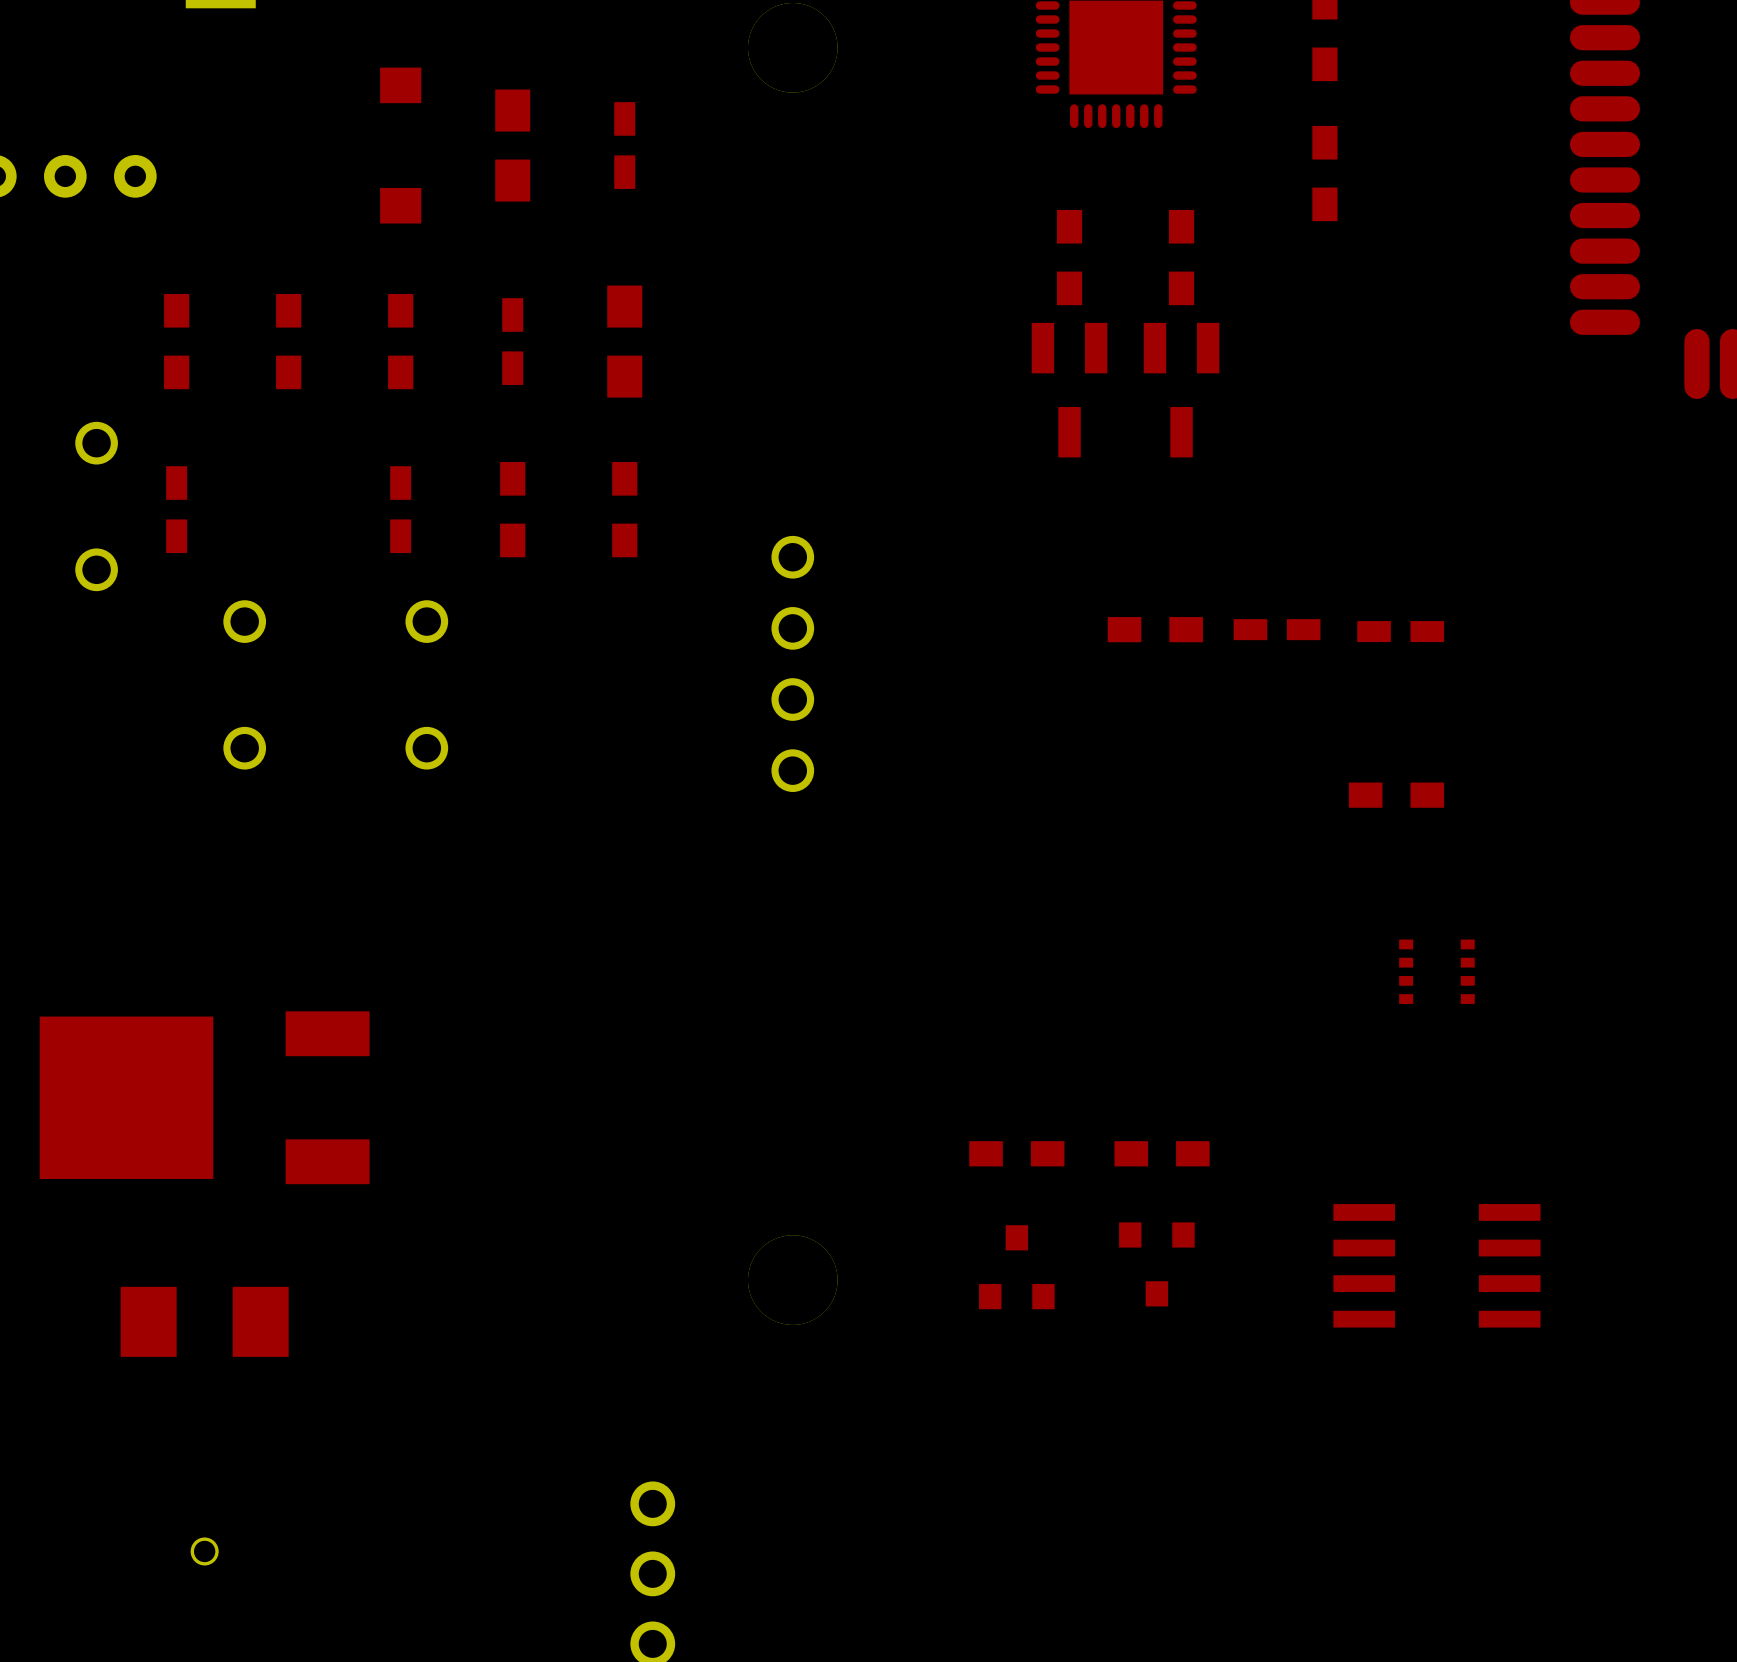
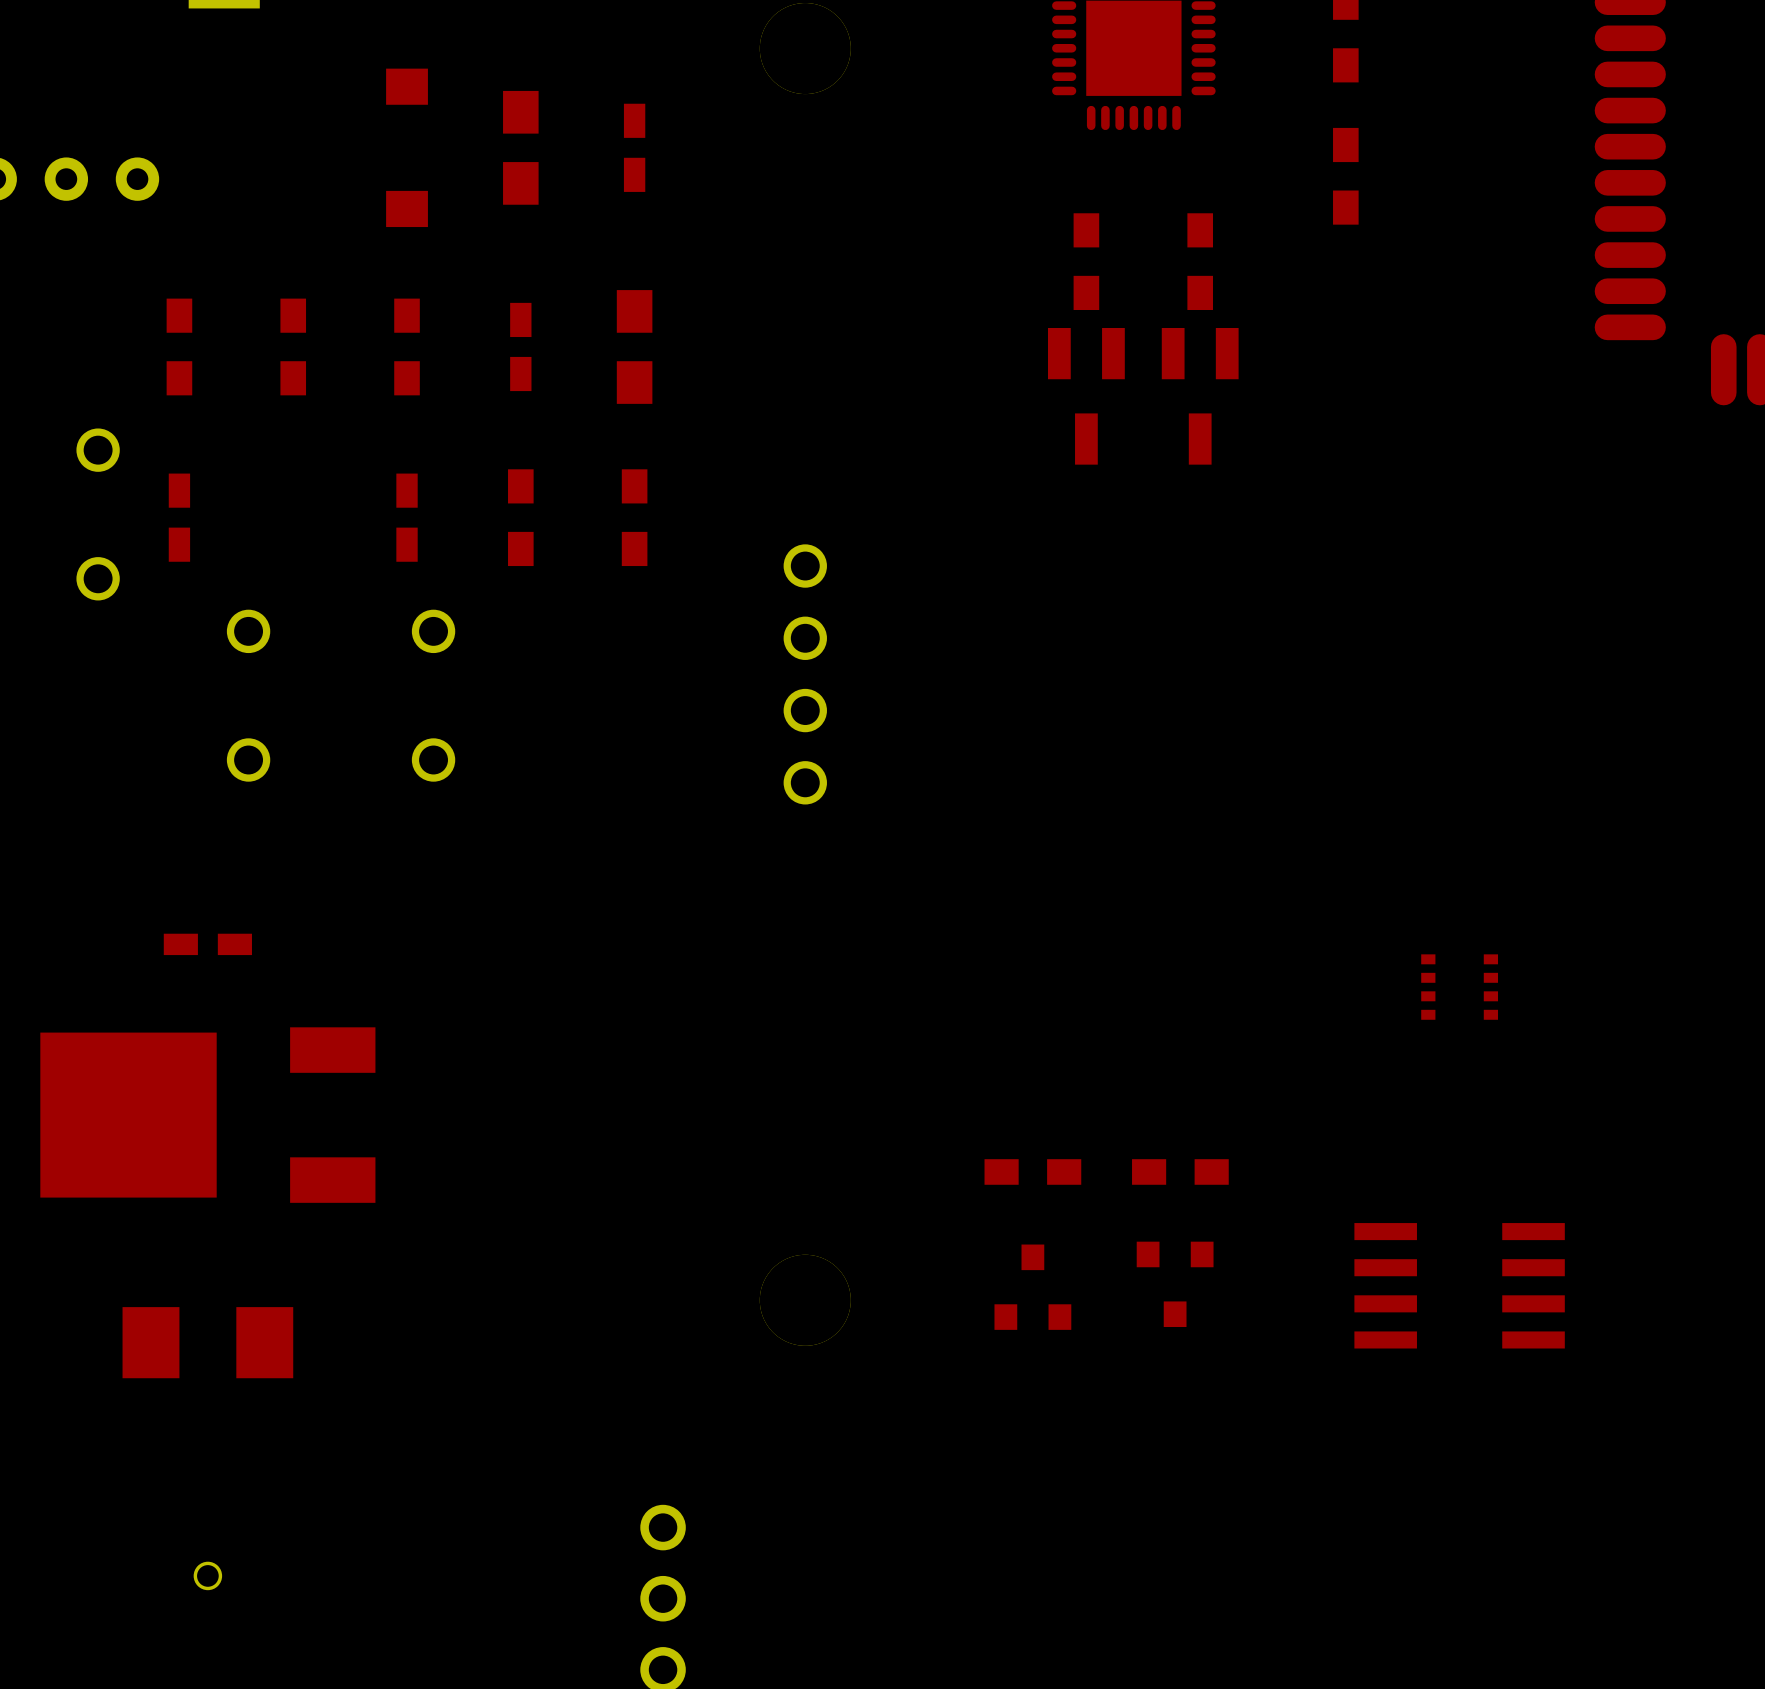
part: (1155, 629) -> none
part: (1277, 629) -> none
part: (1400, 631) -> none
part: (1396, 795) -> none
part: none -> (207, 944)

